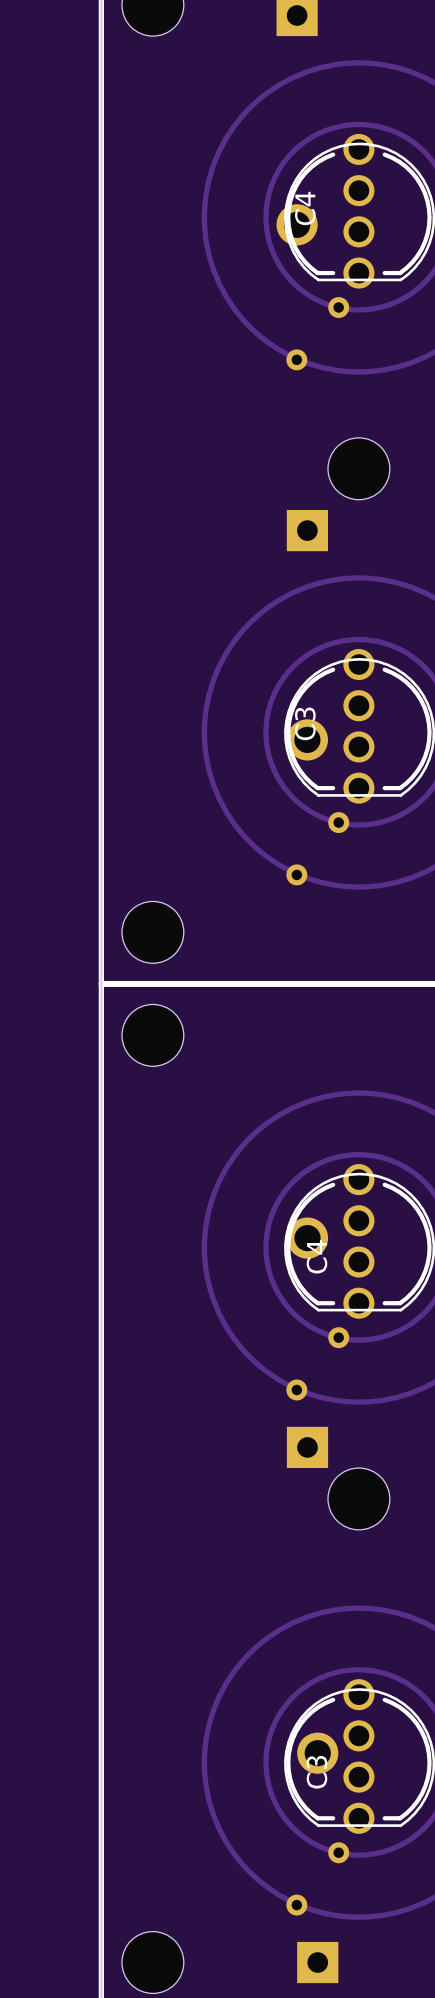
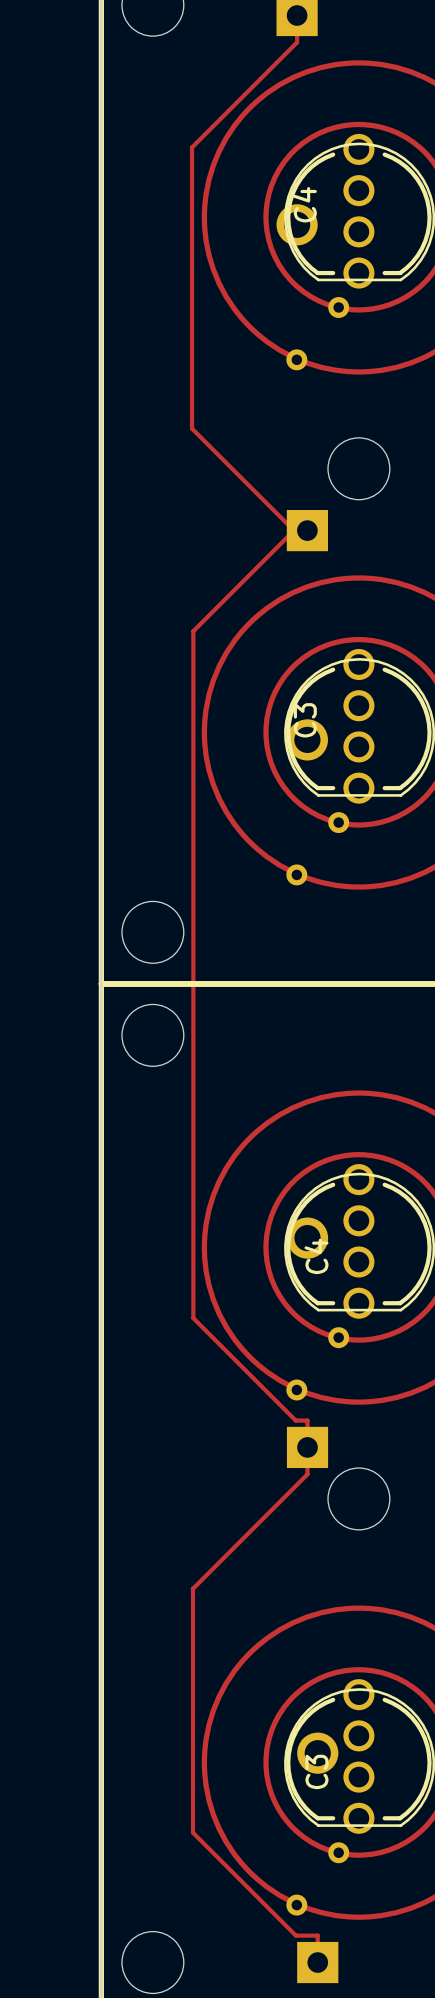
track: none -> (297, 15) (297, 42) (192, 147) (192, 428) (293, 530)
track: none -> (293, 530) (193, 631) (193, 1318) (295, 1420) (307, 1420) (307, 1474) (192, 1588) (192, 1832) (295, 1935) (317, 1935) (317, 1962)

